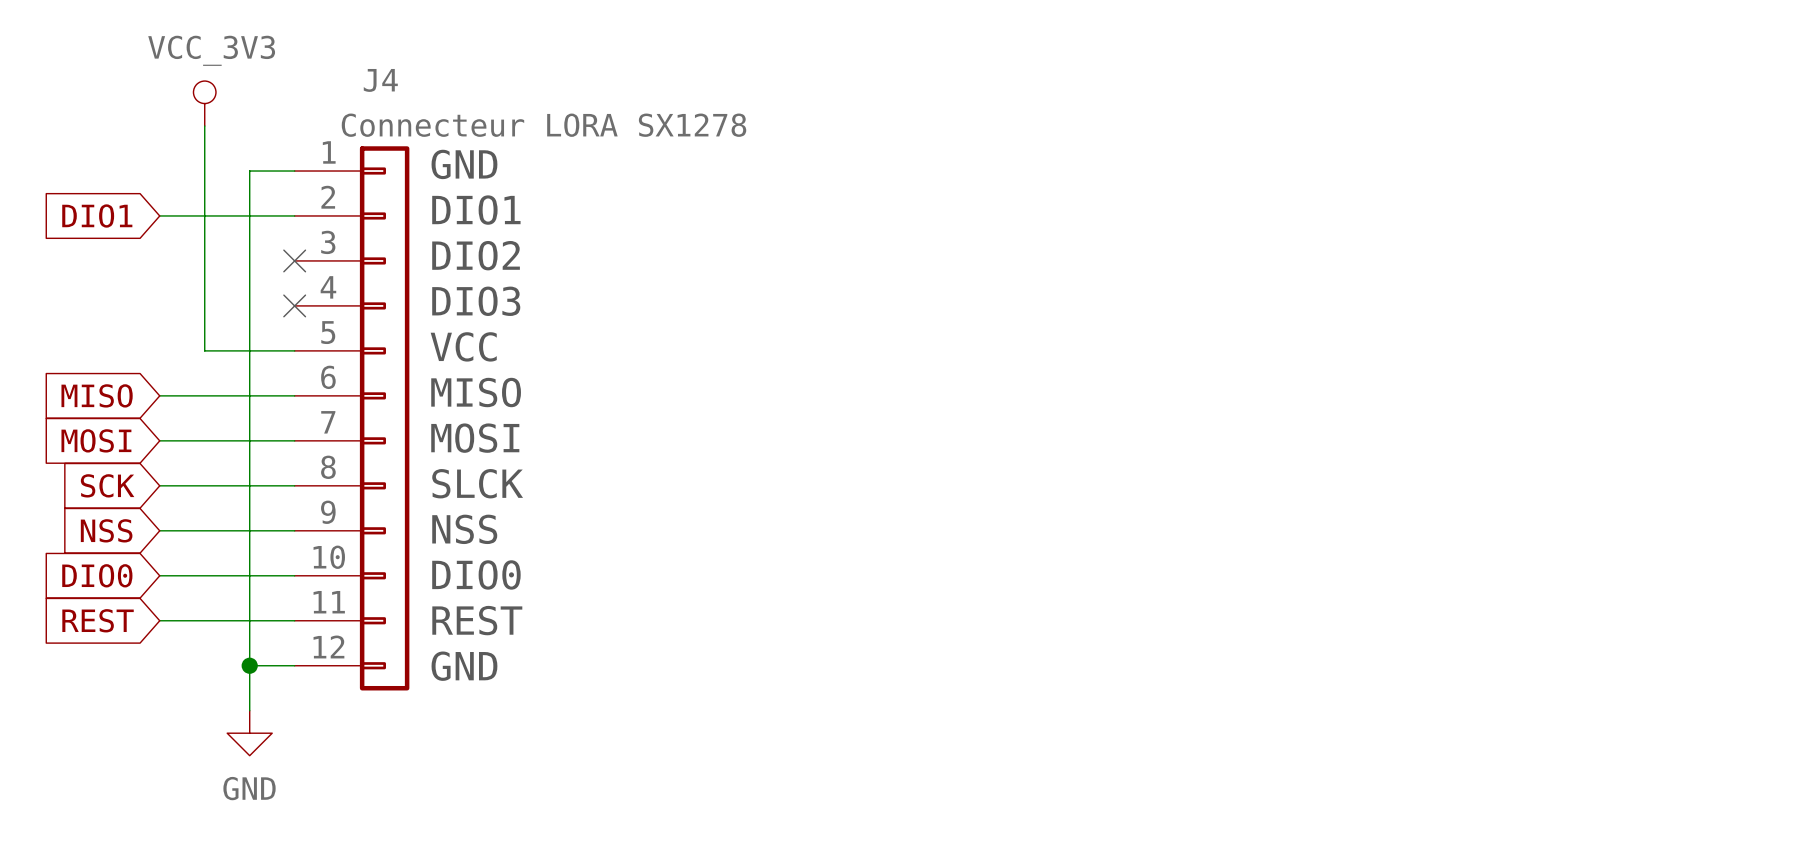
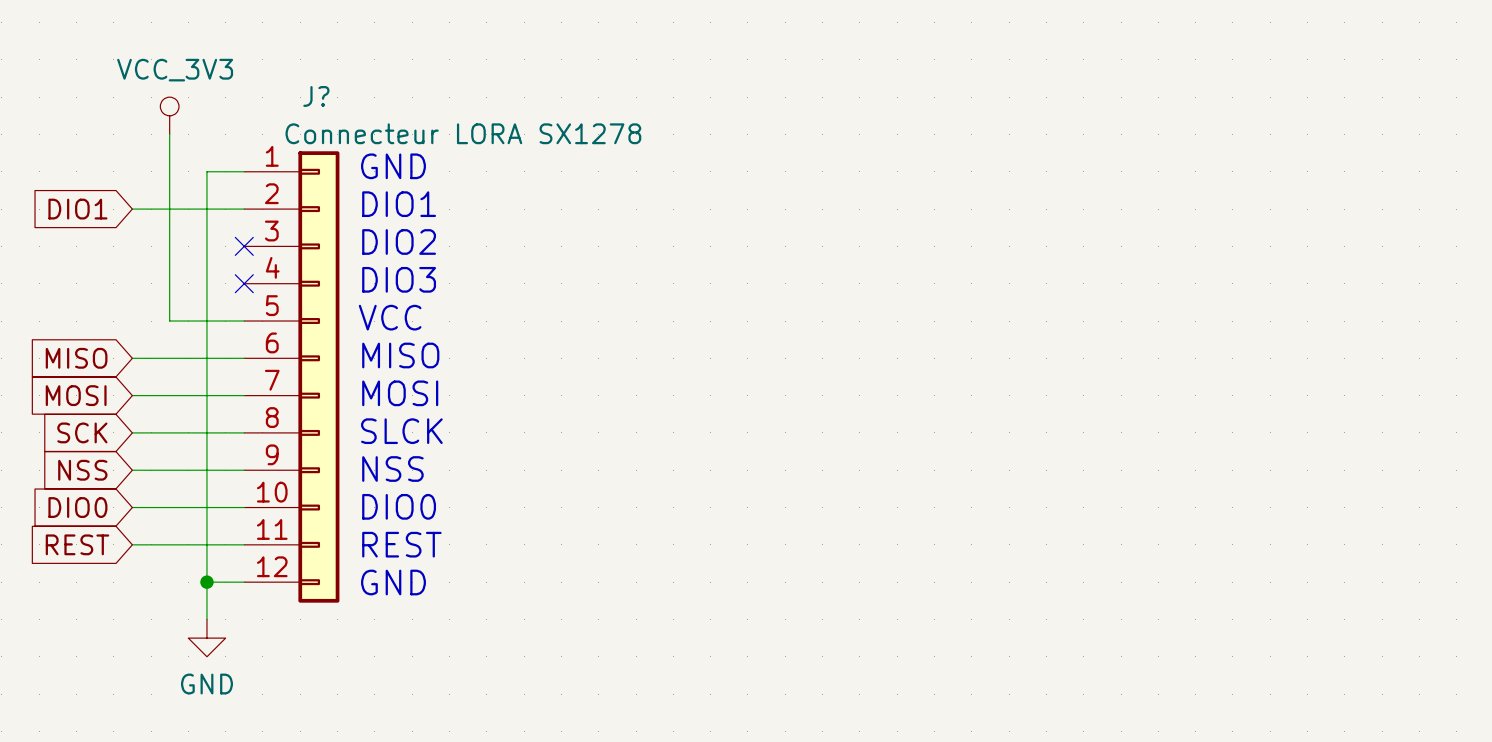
J4 name: J4 (380, 80) -> J? (316, 96)

